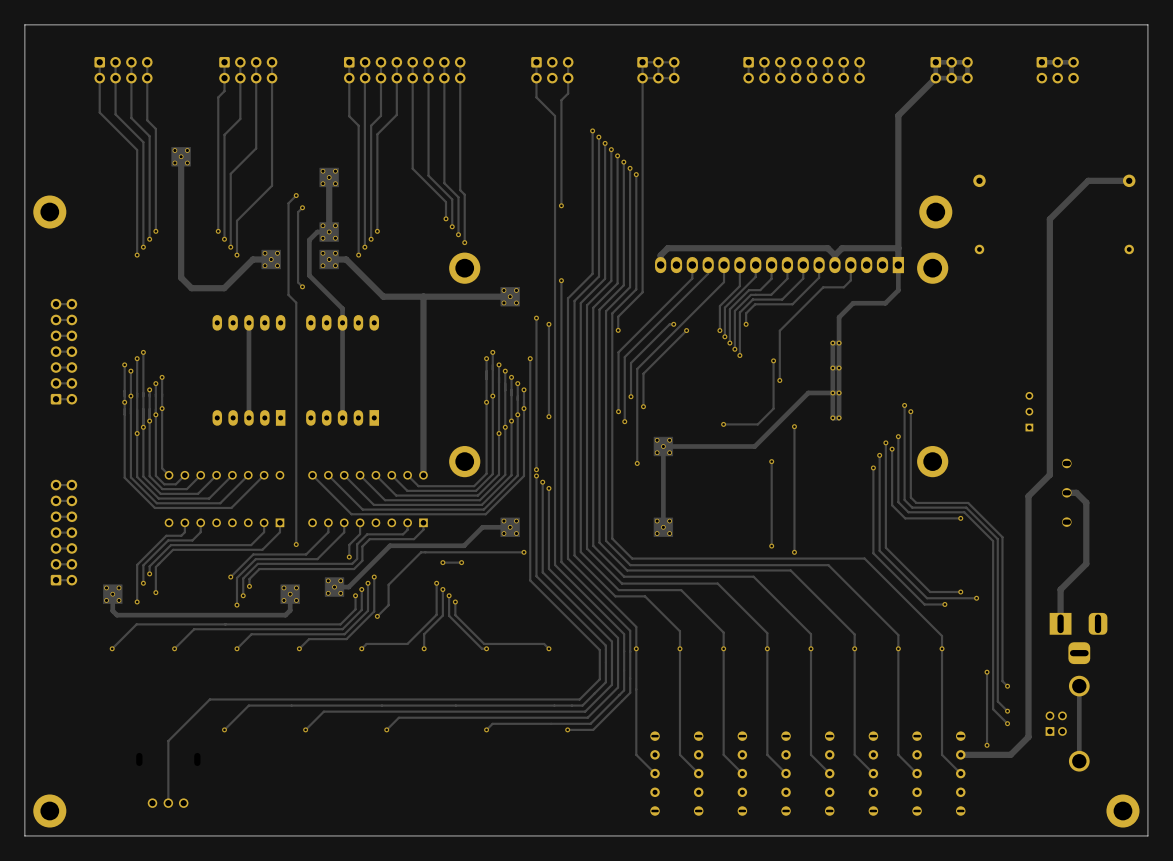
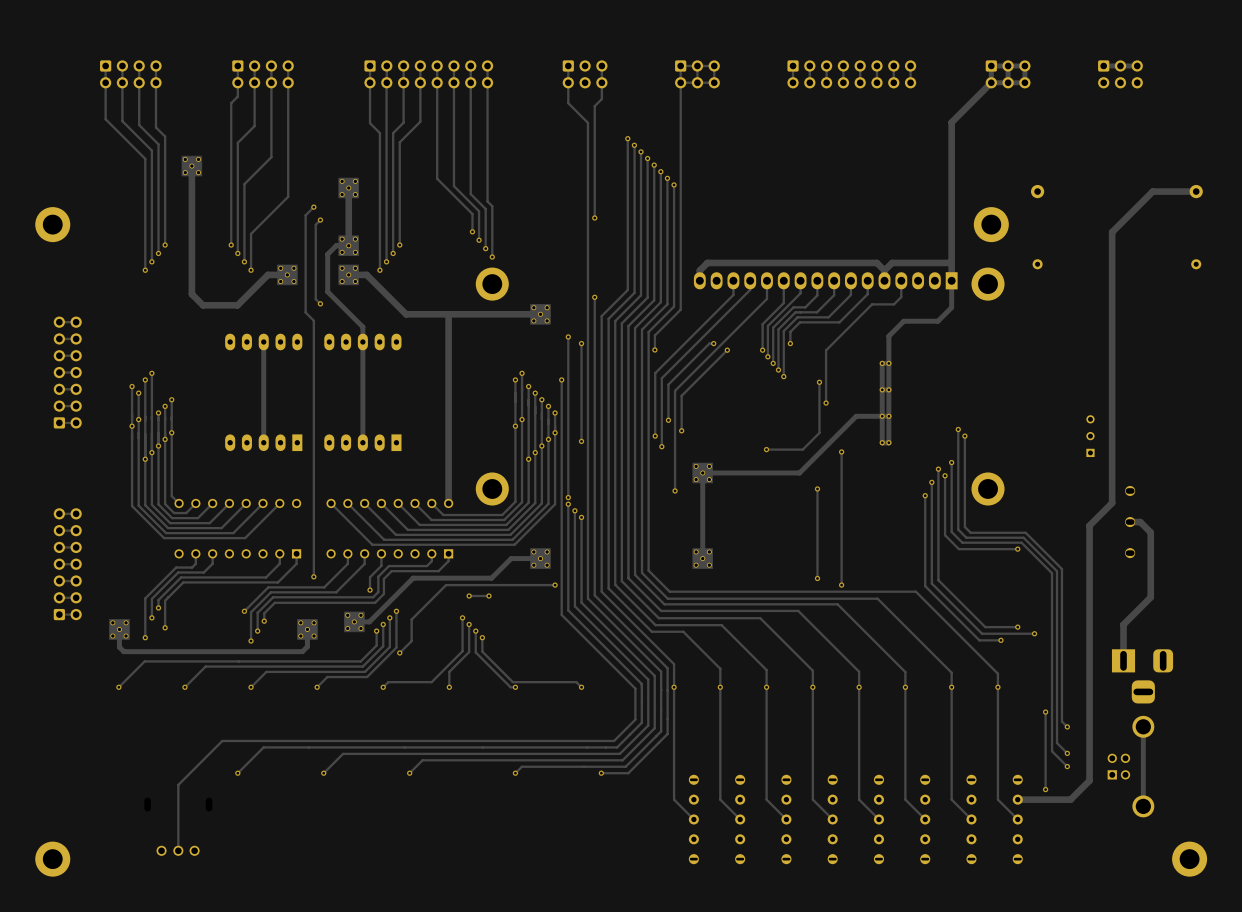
board edge: (1147, 24) (24, 24) (24, 835) (1147, 835) (1147, 24) -> none

